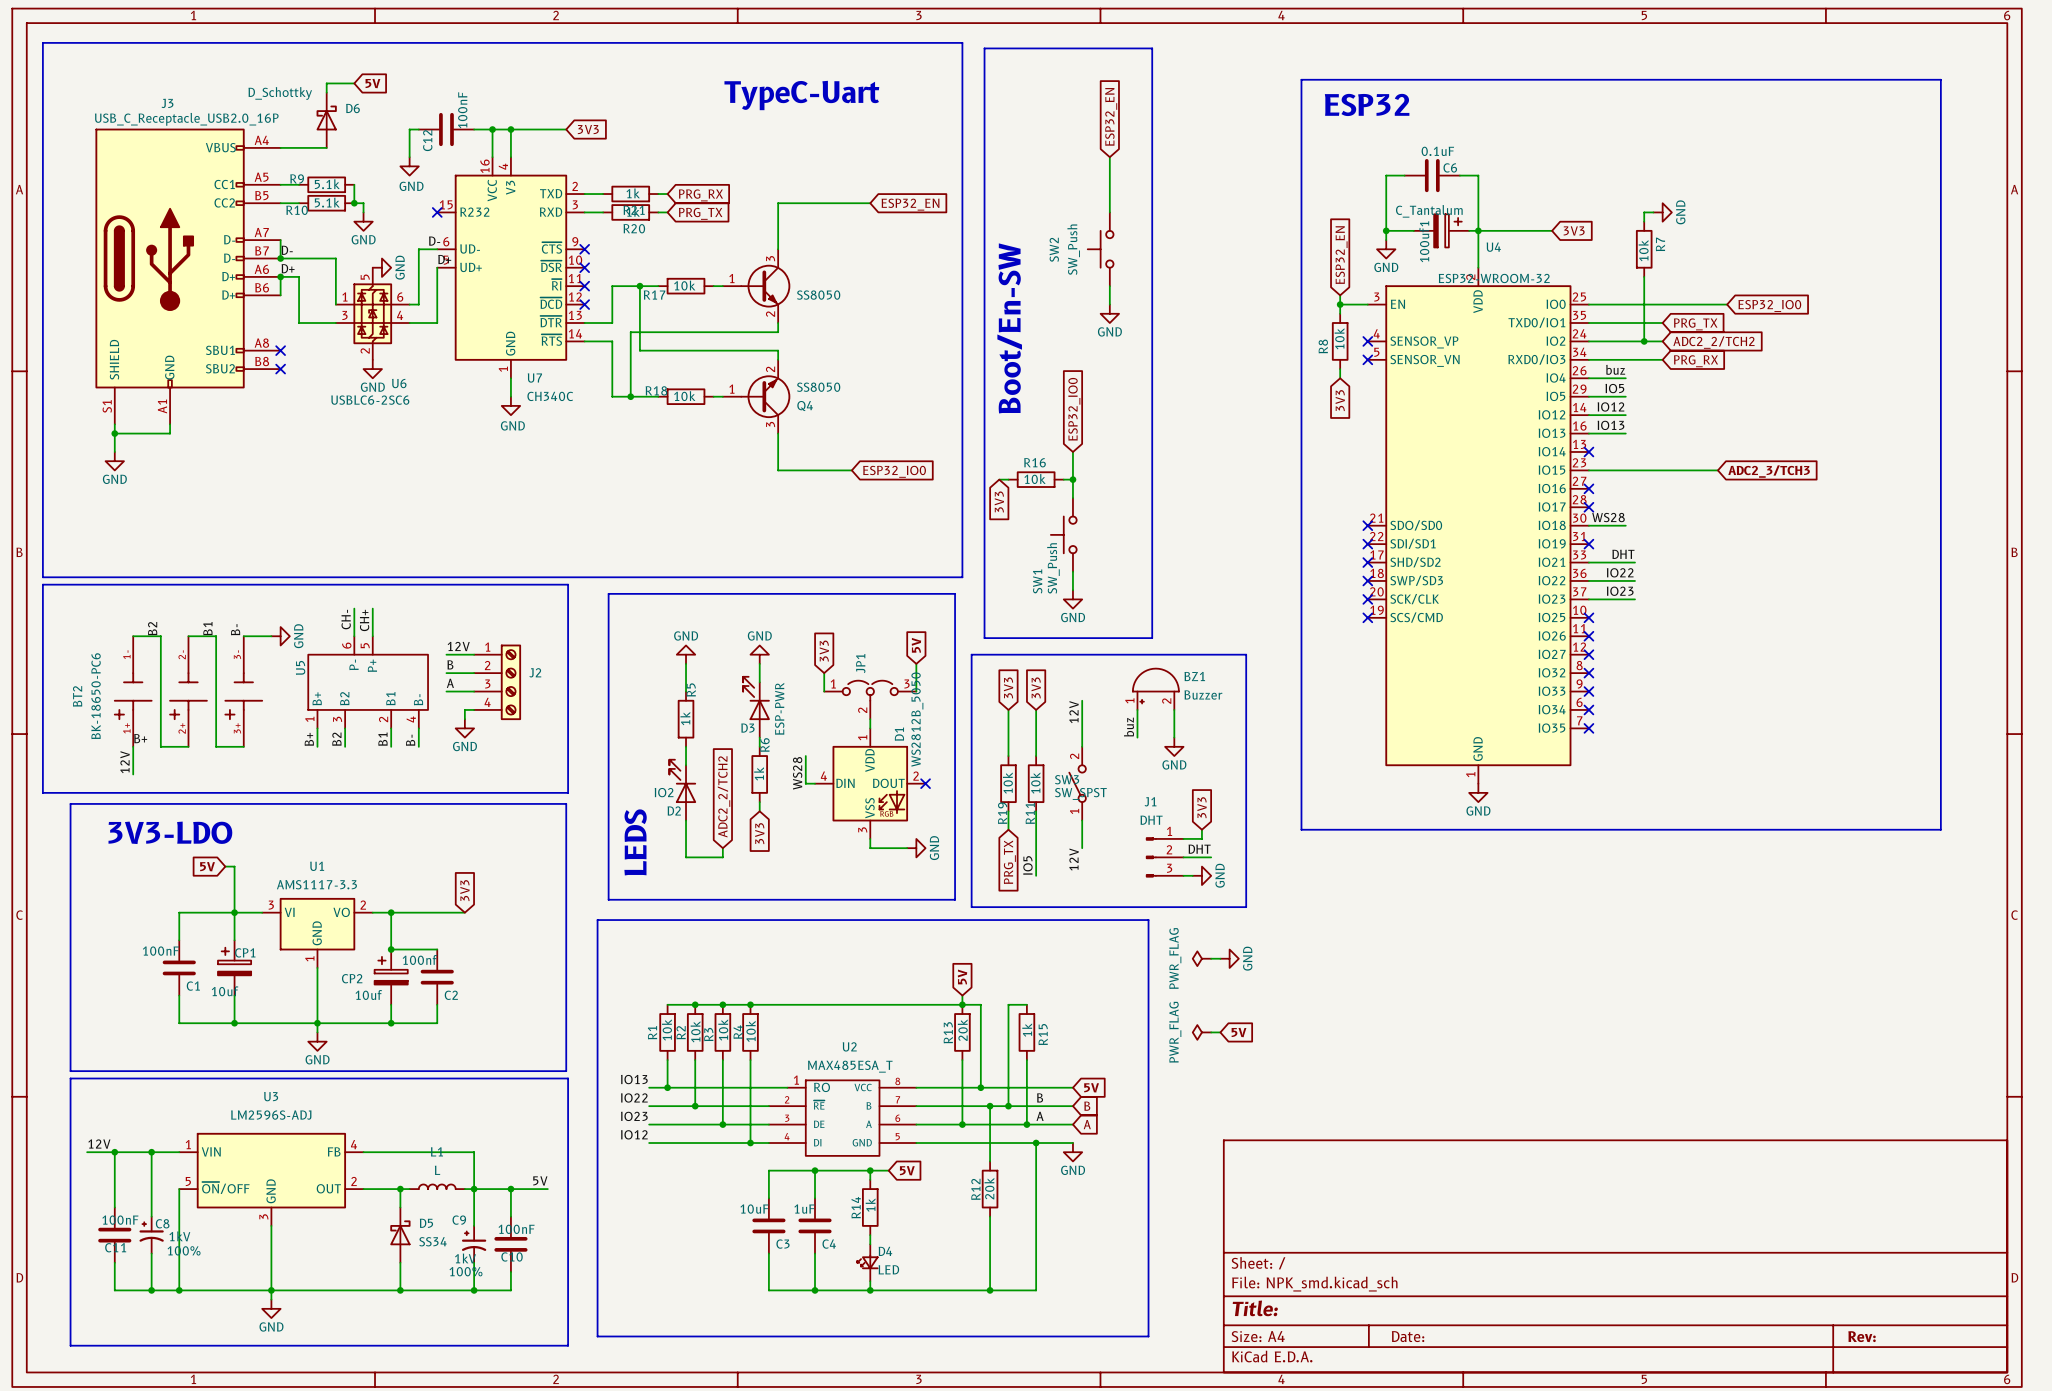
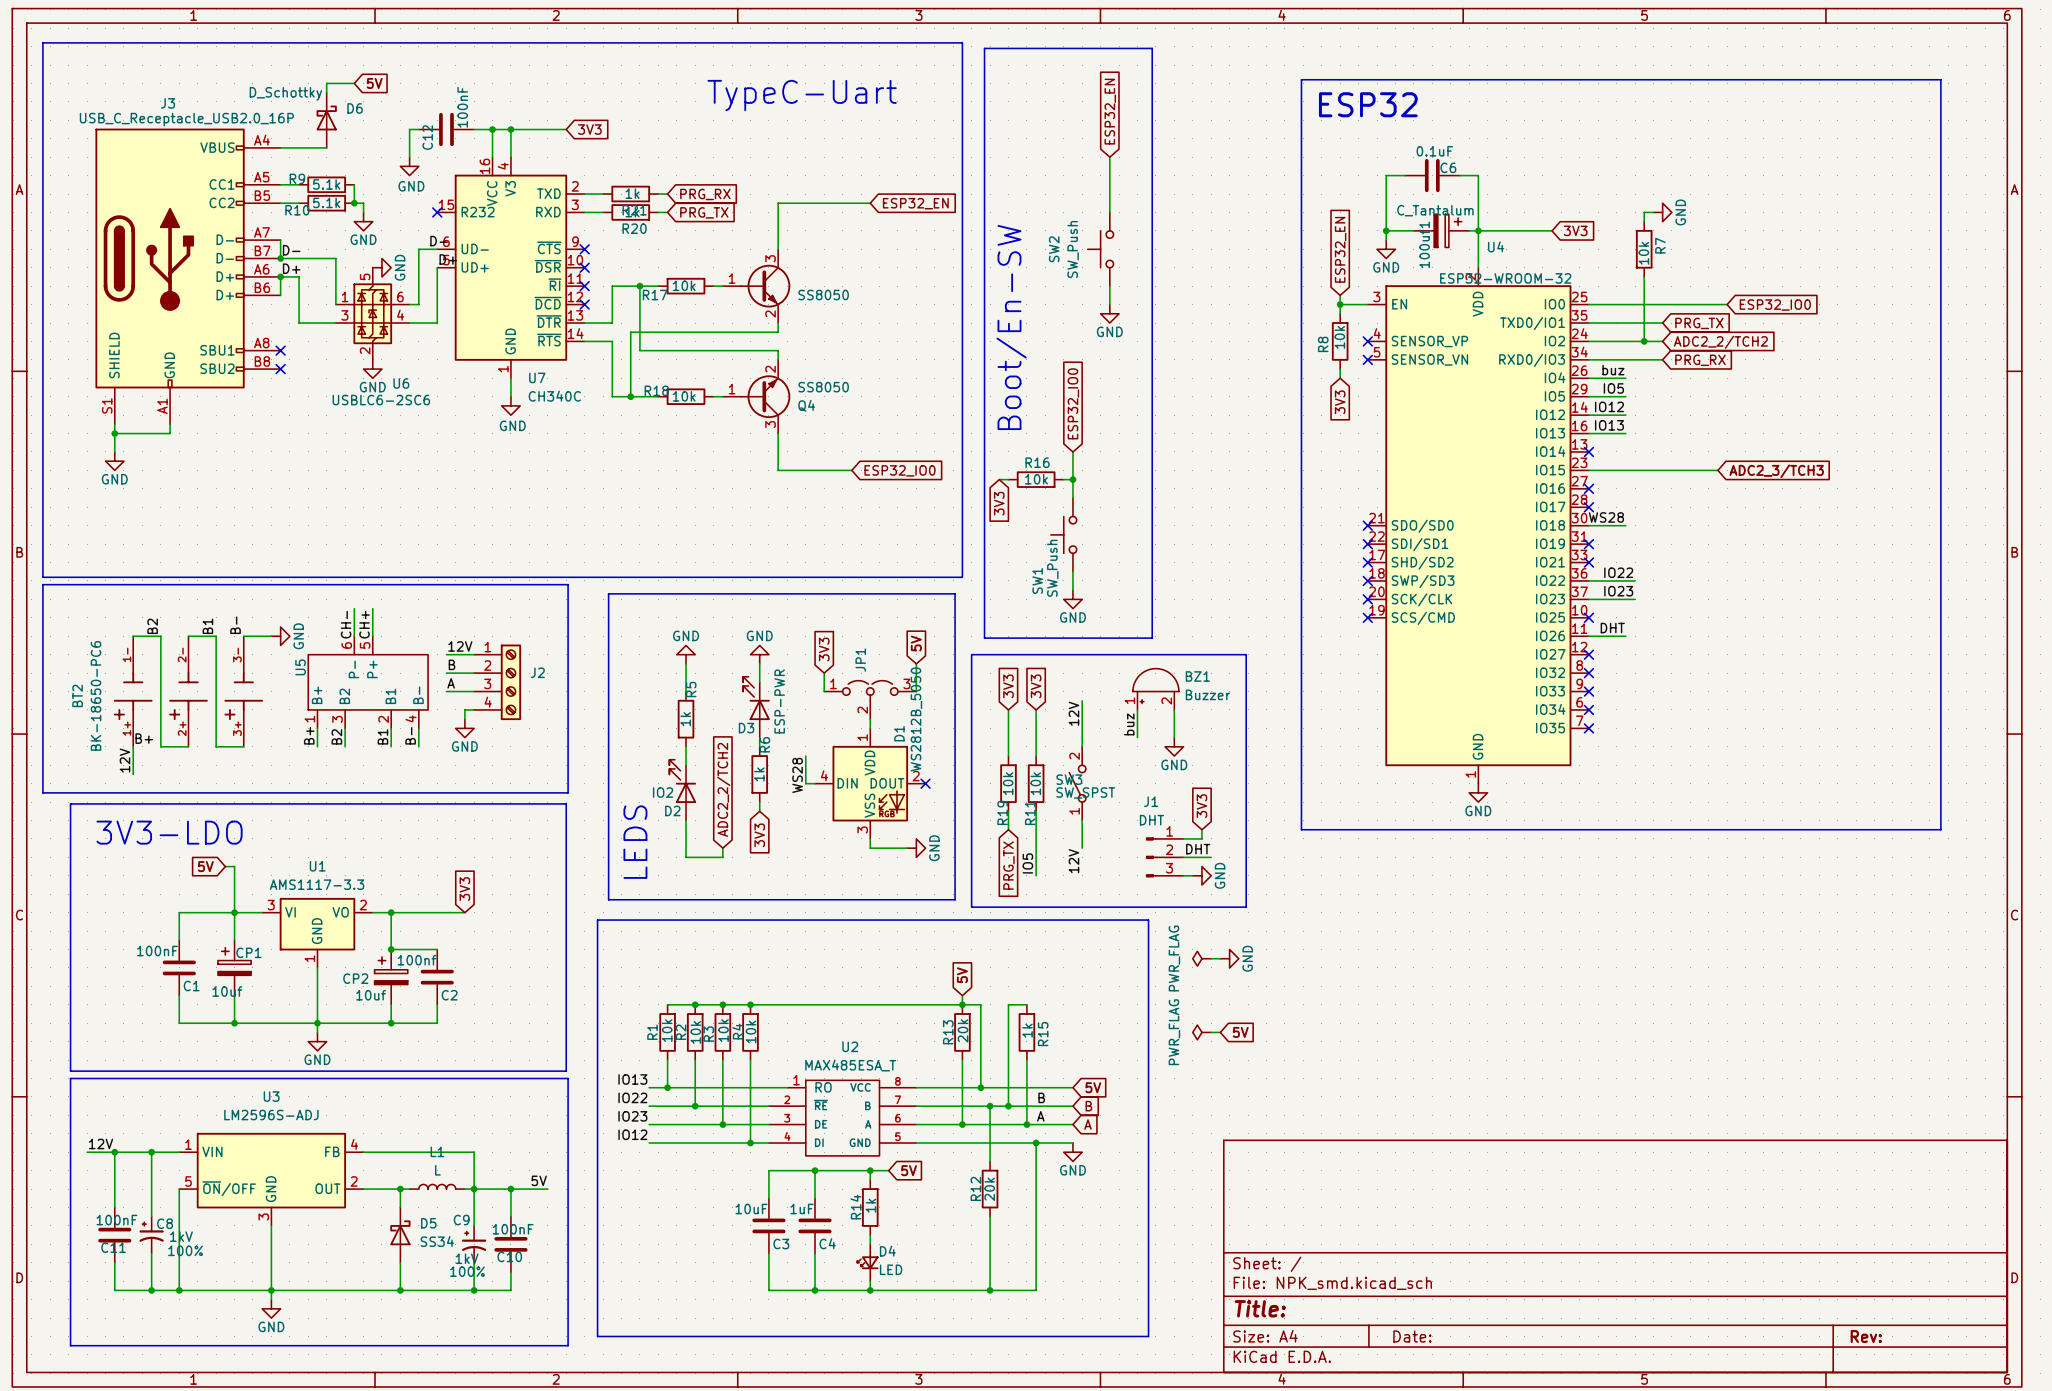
label position: DHT (1623, 554) -> DHT (1612, 628)
wire: (1588, 562) (1635, 562) -> none
no-connect mark: none -> (1588, 562)
wire: none -> (1588, 636) (1625, 636)
no-connect mark: (1588, 636) -> none

